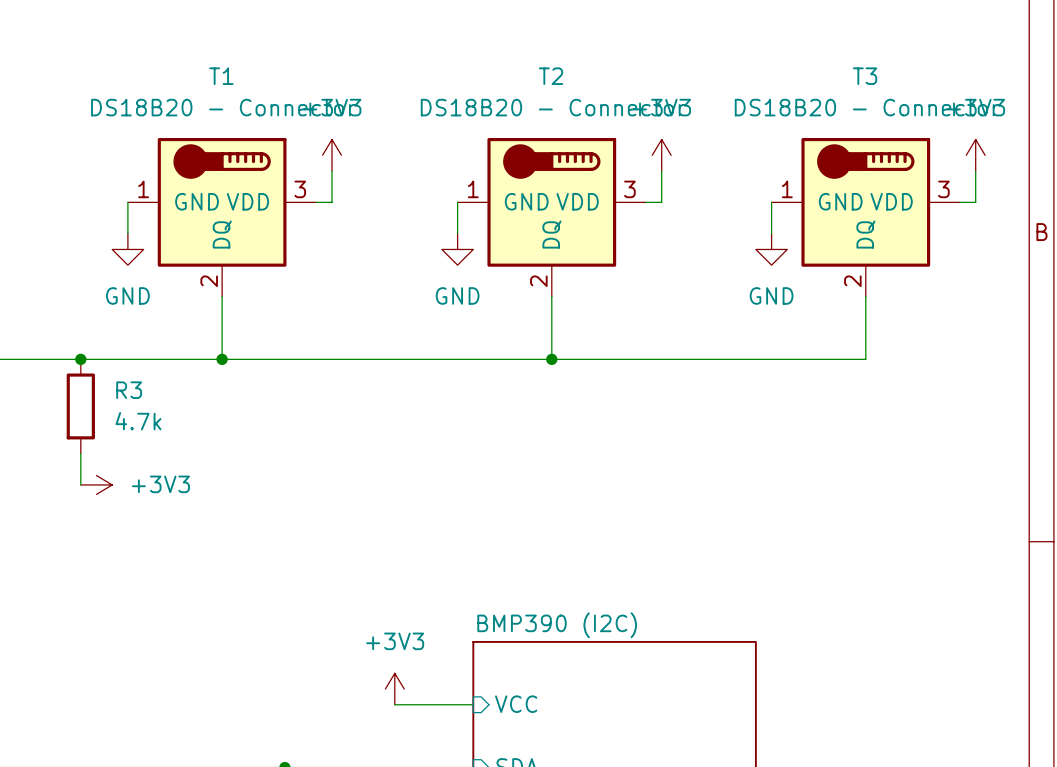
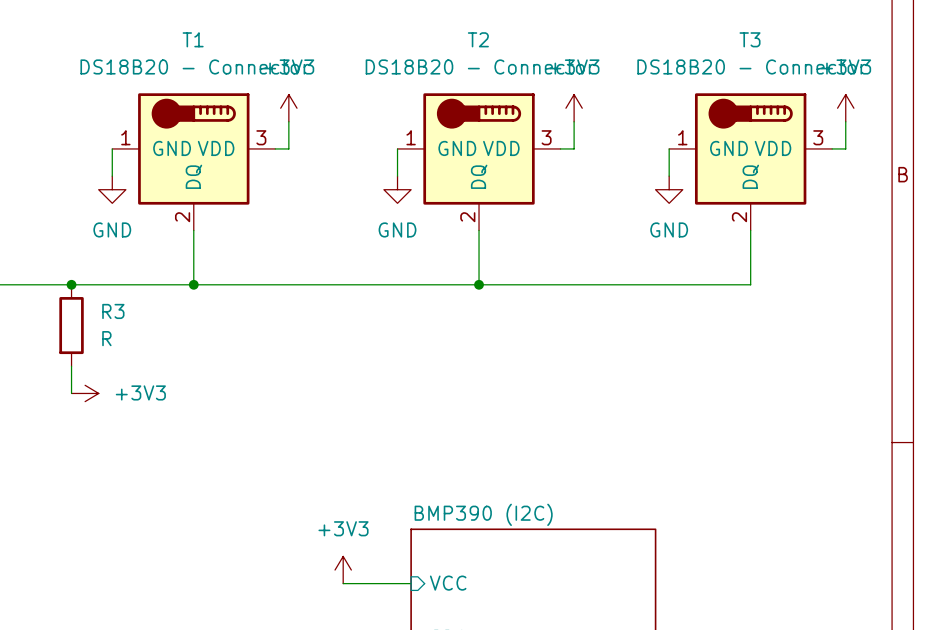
R3 value: 4.7k (138, 421) -> R (106, 338)

